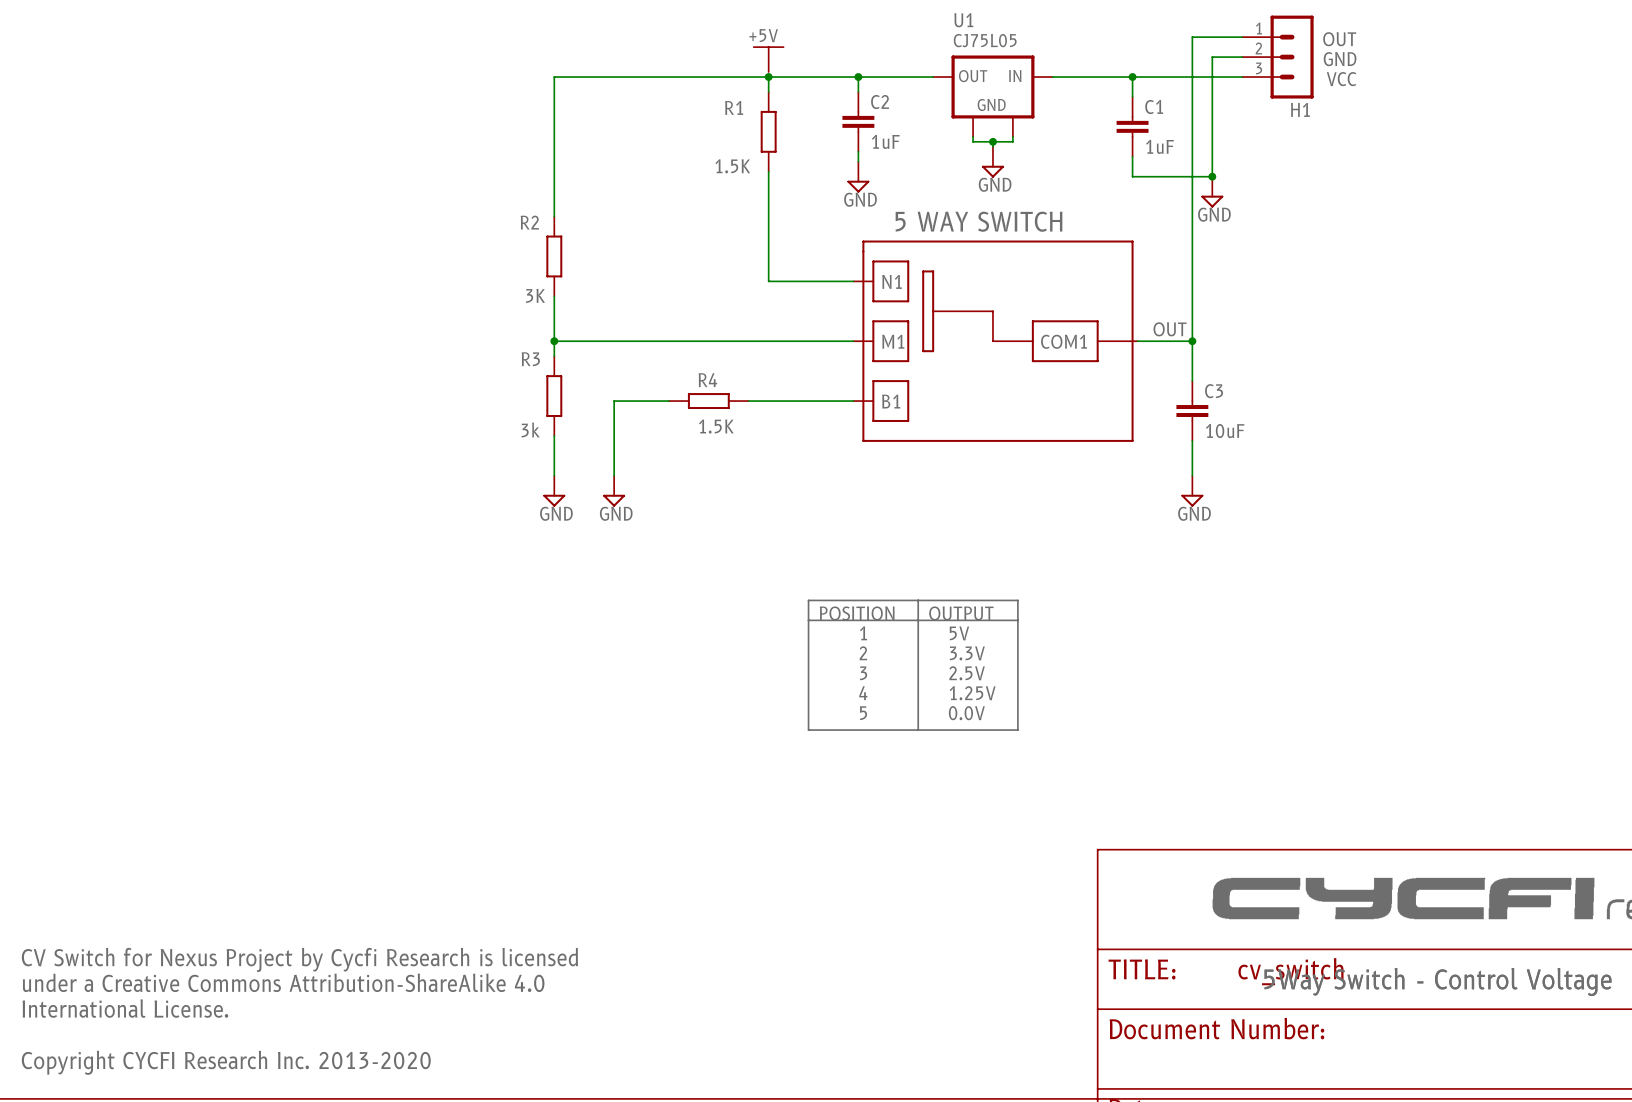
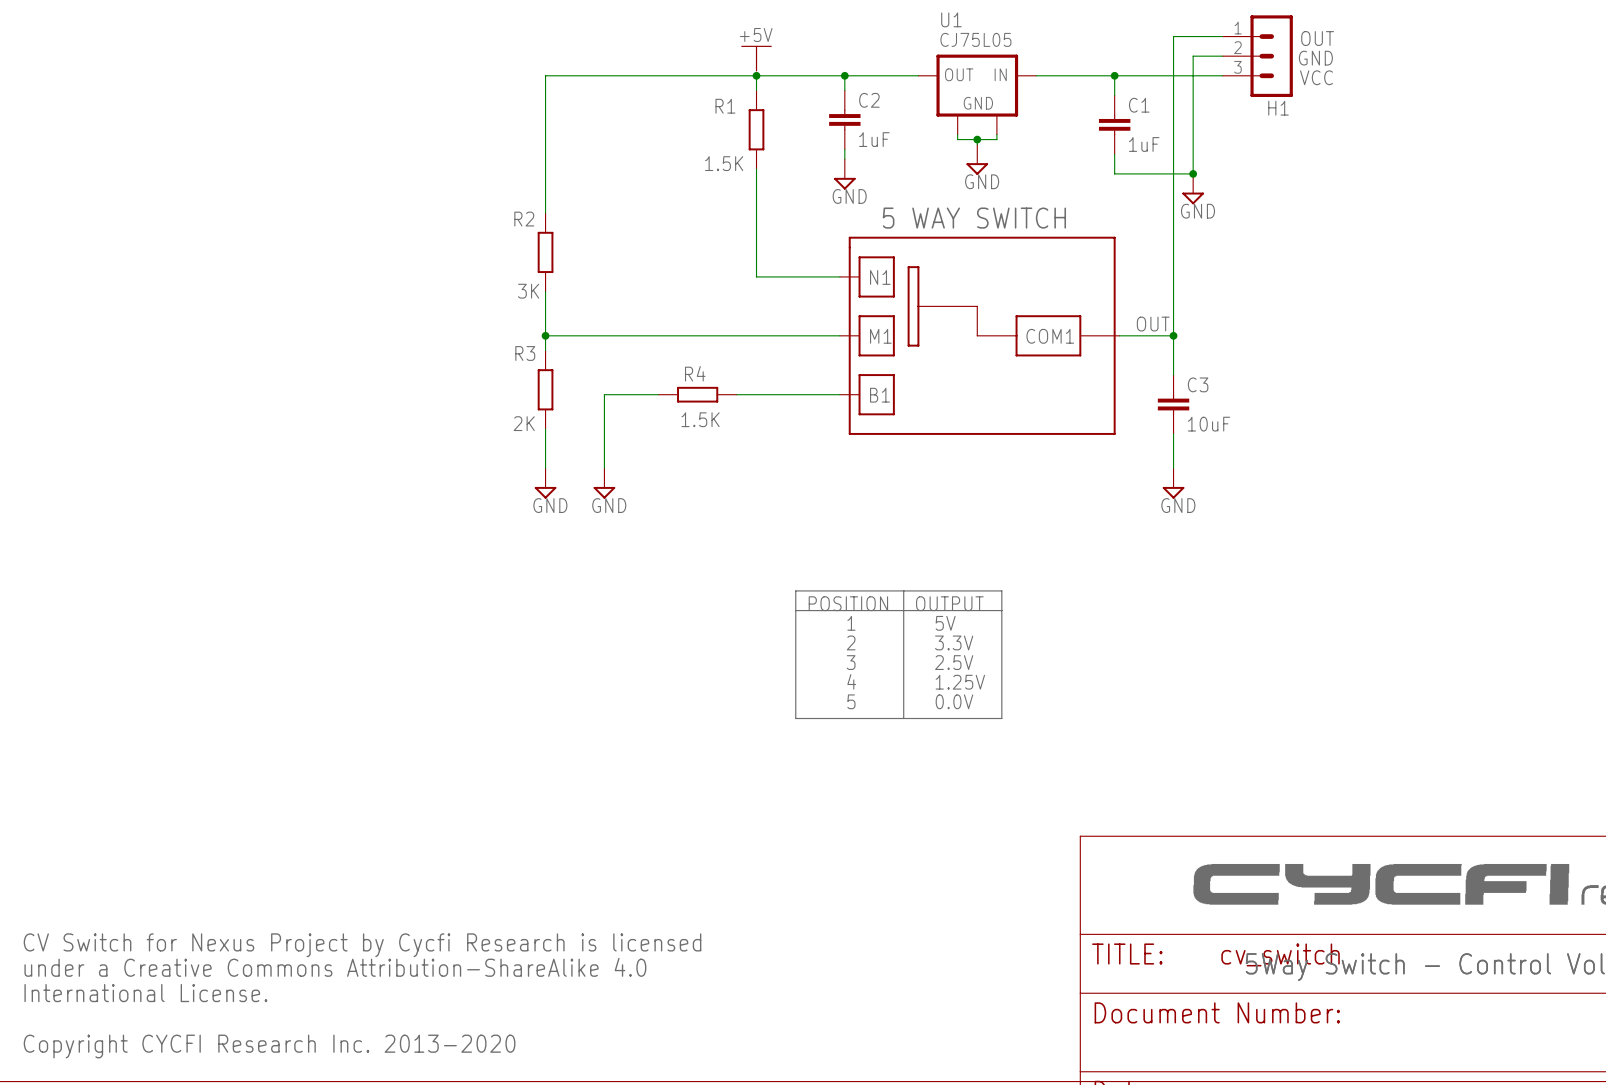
R3 value: 3k (530, 429) -> 2K (524, 423)

